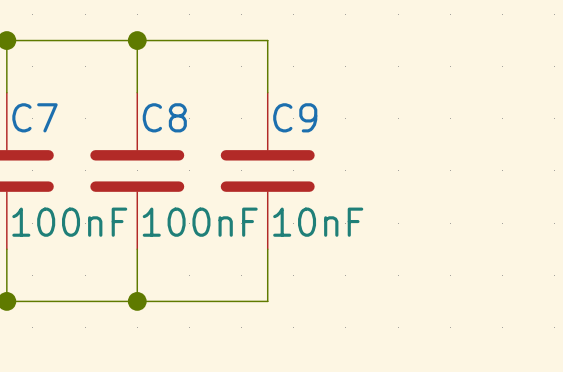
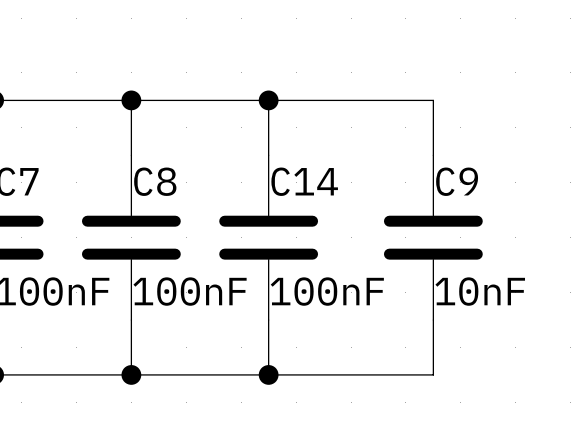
wire: none -> (268, 100) (433, 100) (433, 155)
junction: none -> (268, 100)
C9 name: C9 (295, 117) -> C14 (304, 181)
C9: none -> 10nF (433, 237)
C9 value: 10nF (318, 222) -> 100nF (327, 291)
wire: none -> (433, 320) (433, 374) (268, 374)
junction: none -> (268, 374)

